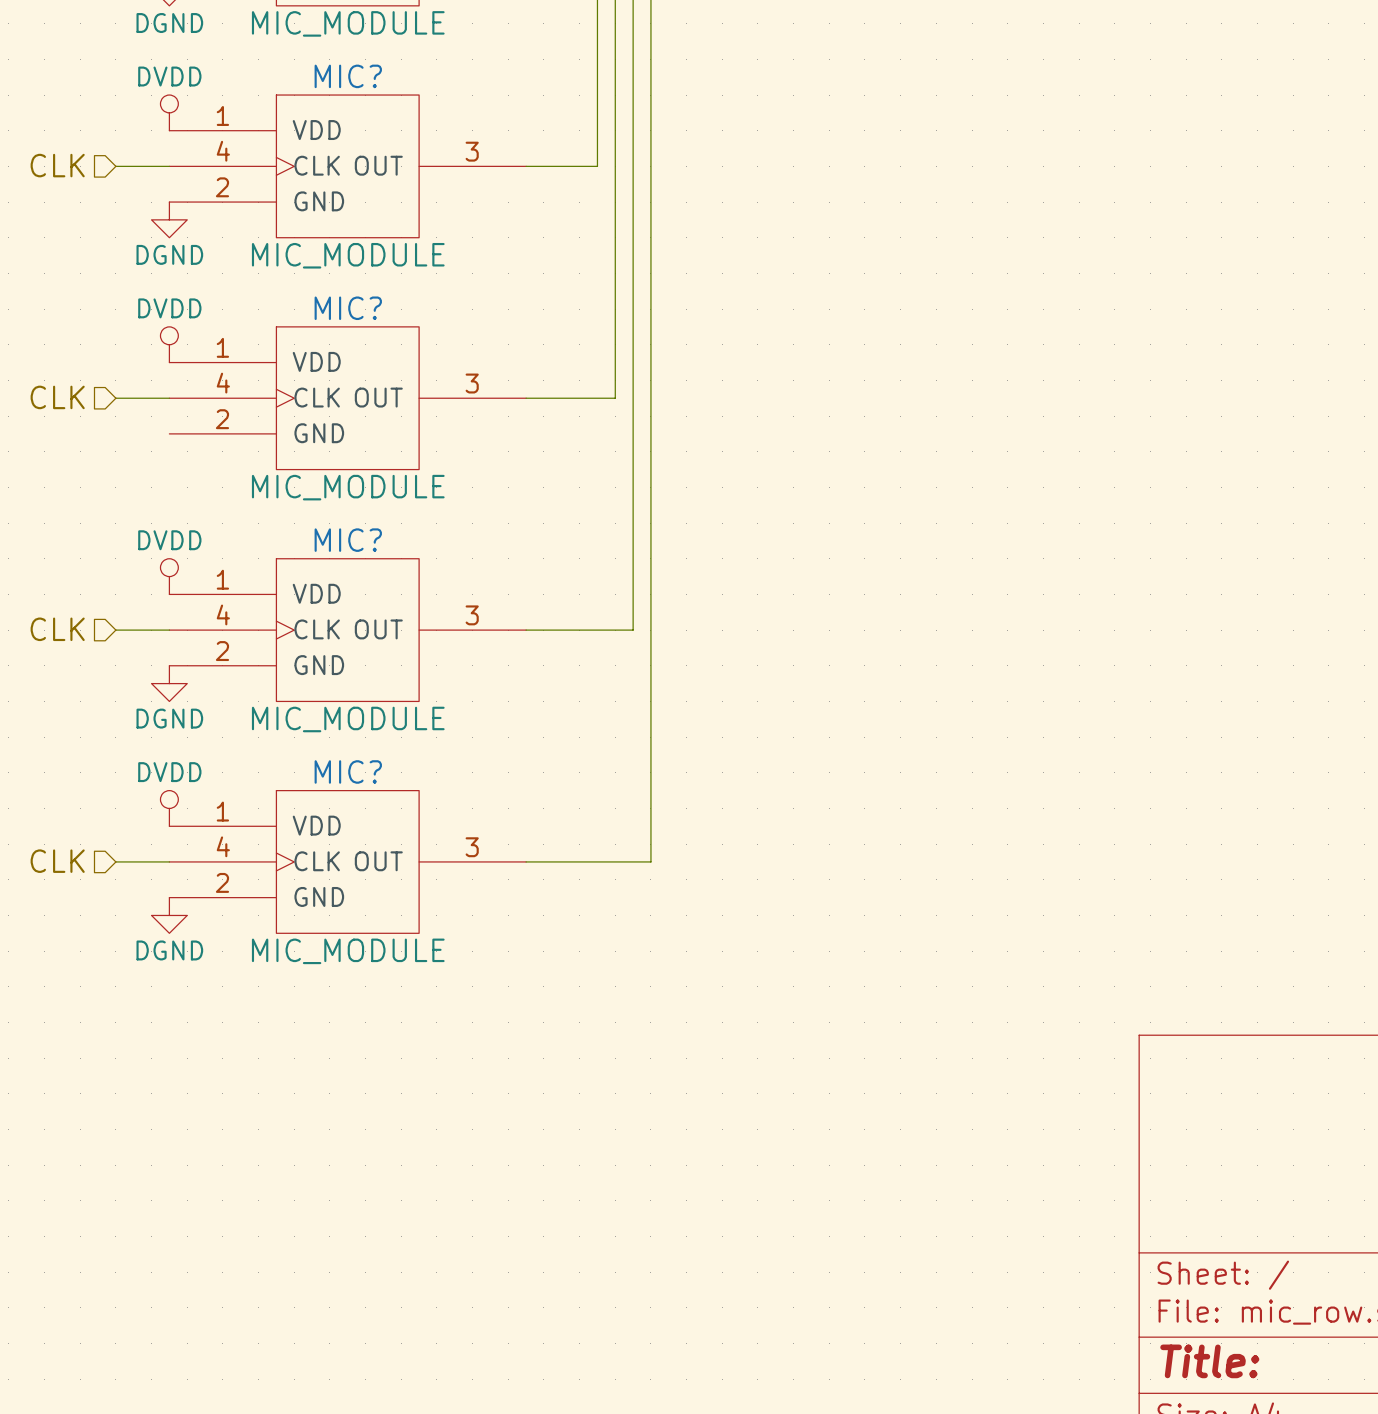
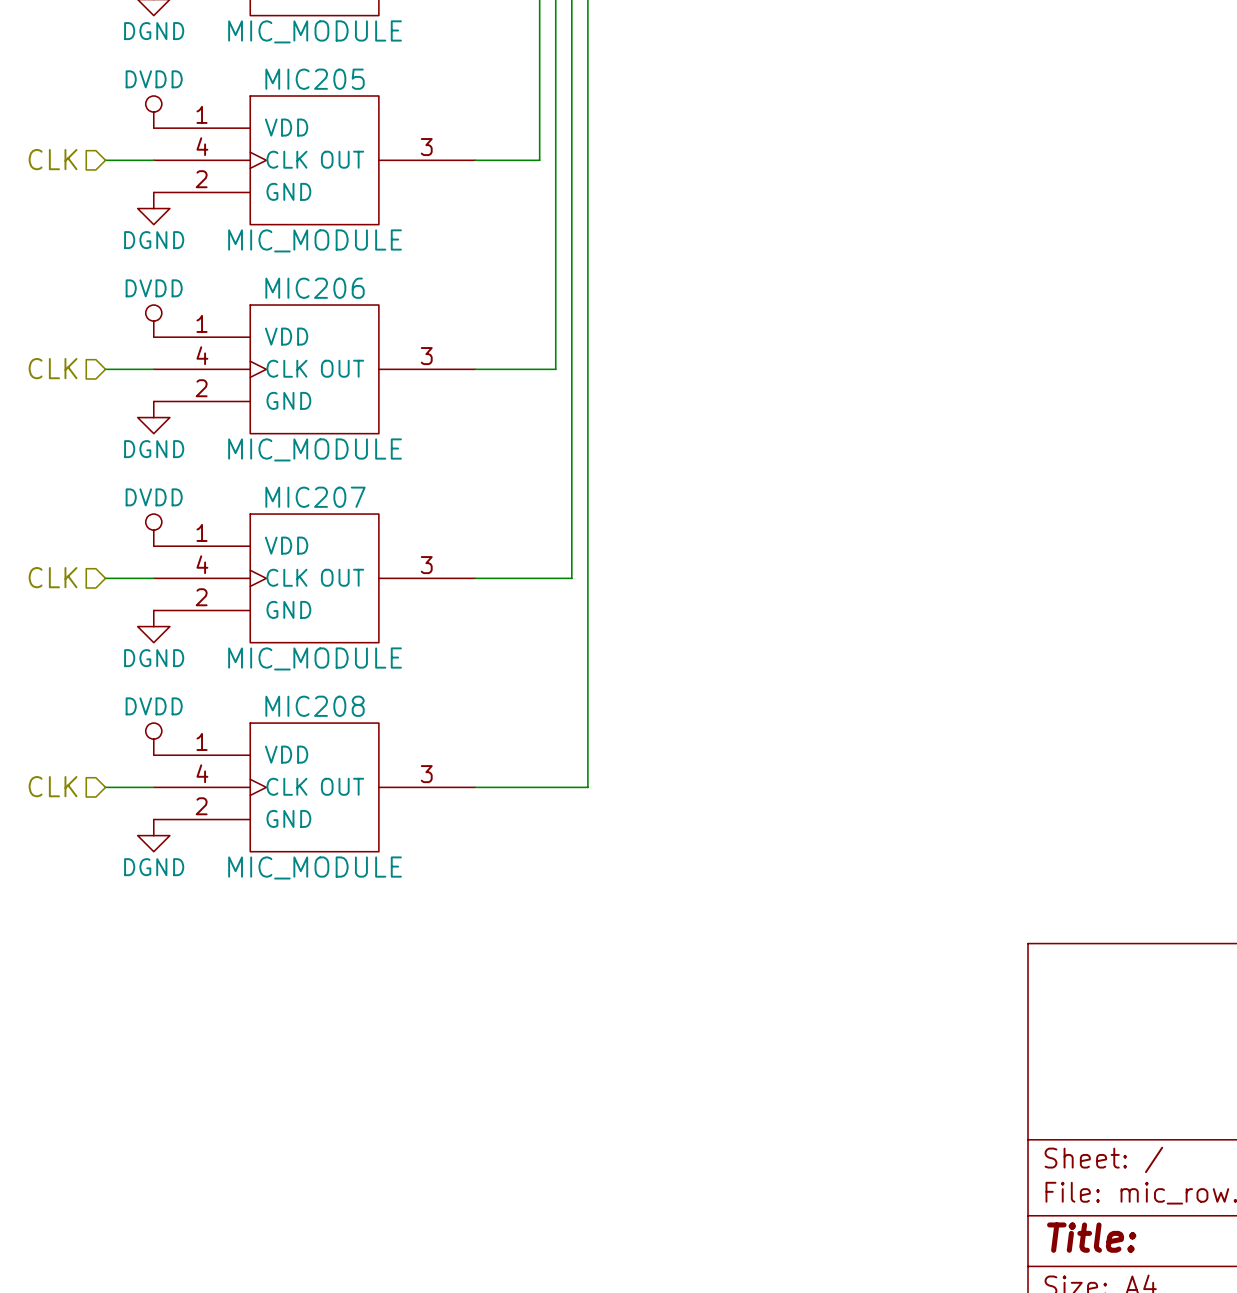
MIC? name: MIC? (348, 76) -> MIC205 (315, 79)
MIC? name: MIC? (348, 308) -> MIC206 (315, 288)
power symbol: none -> DGND (153, 417)
MIC? name: MIC? (348, 540) -> MIC207 (315, 497)
MIC? name: MIC? (348, 771) -> MIC208 (315, 706)

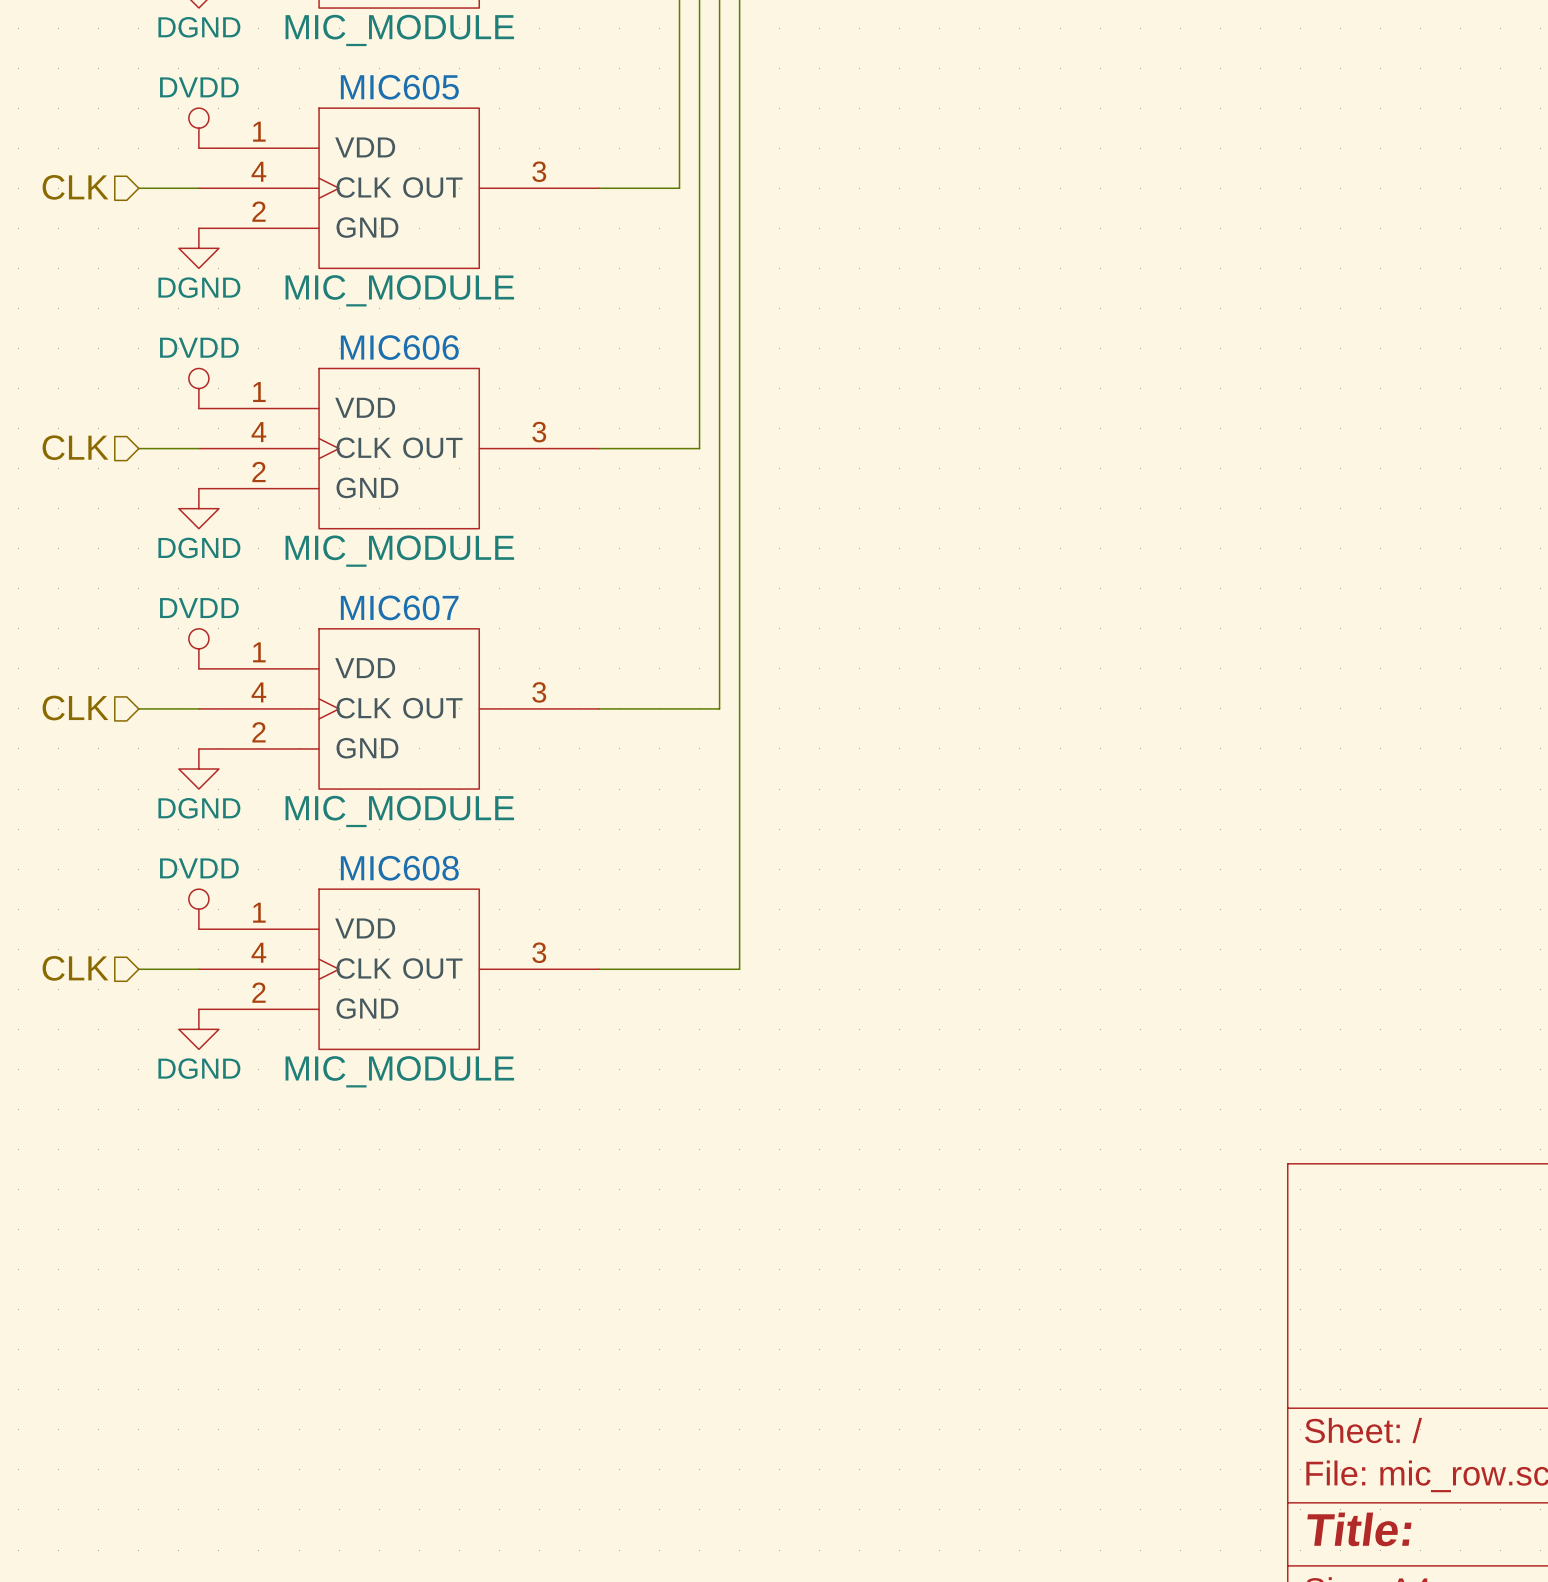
MIC205 name: MIC205 (315, 79) -> MIC605 (399, 87)
MIC206 name: MIC206 (315, 288) -> MIC606 (399, 347)
MIC207 name: MIC207 (315, 497) -> MIC607 (399, 607)
MIC208 name: MIC208 (315, 706) -> MIC608 (399, 868)

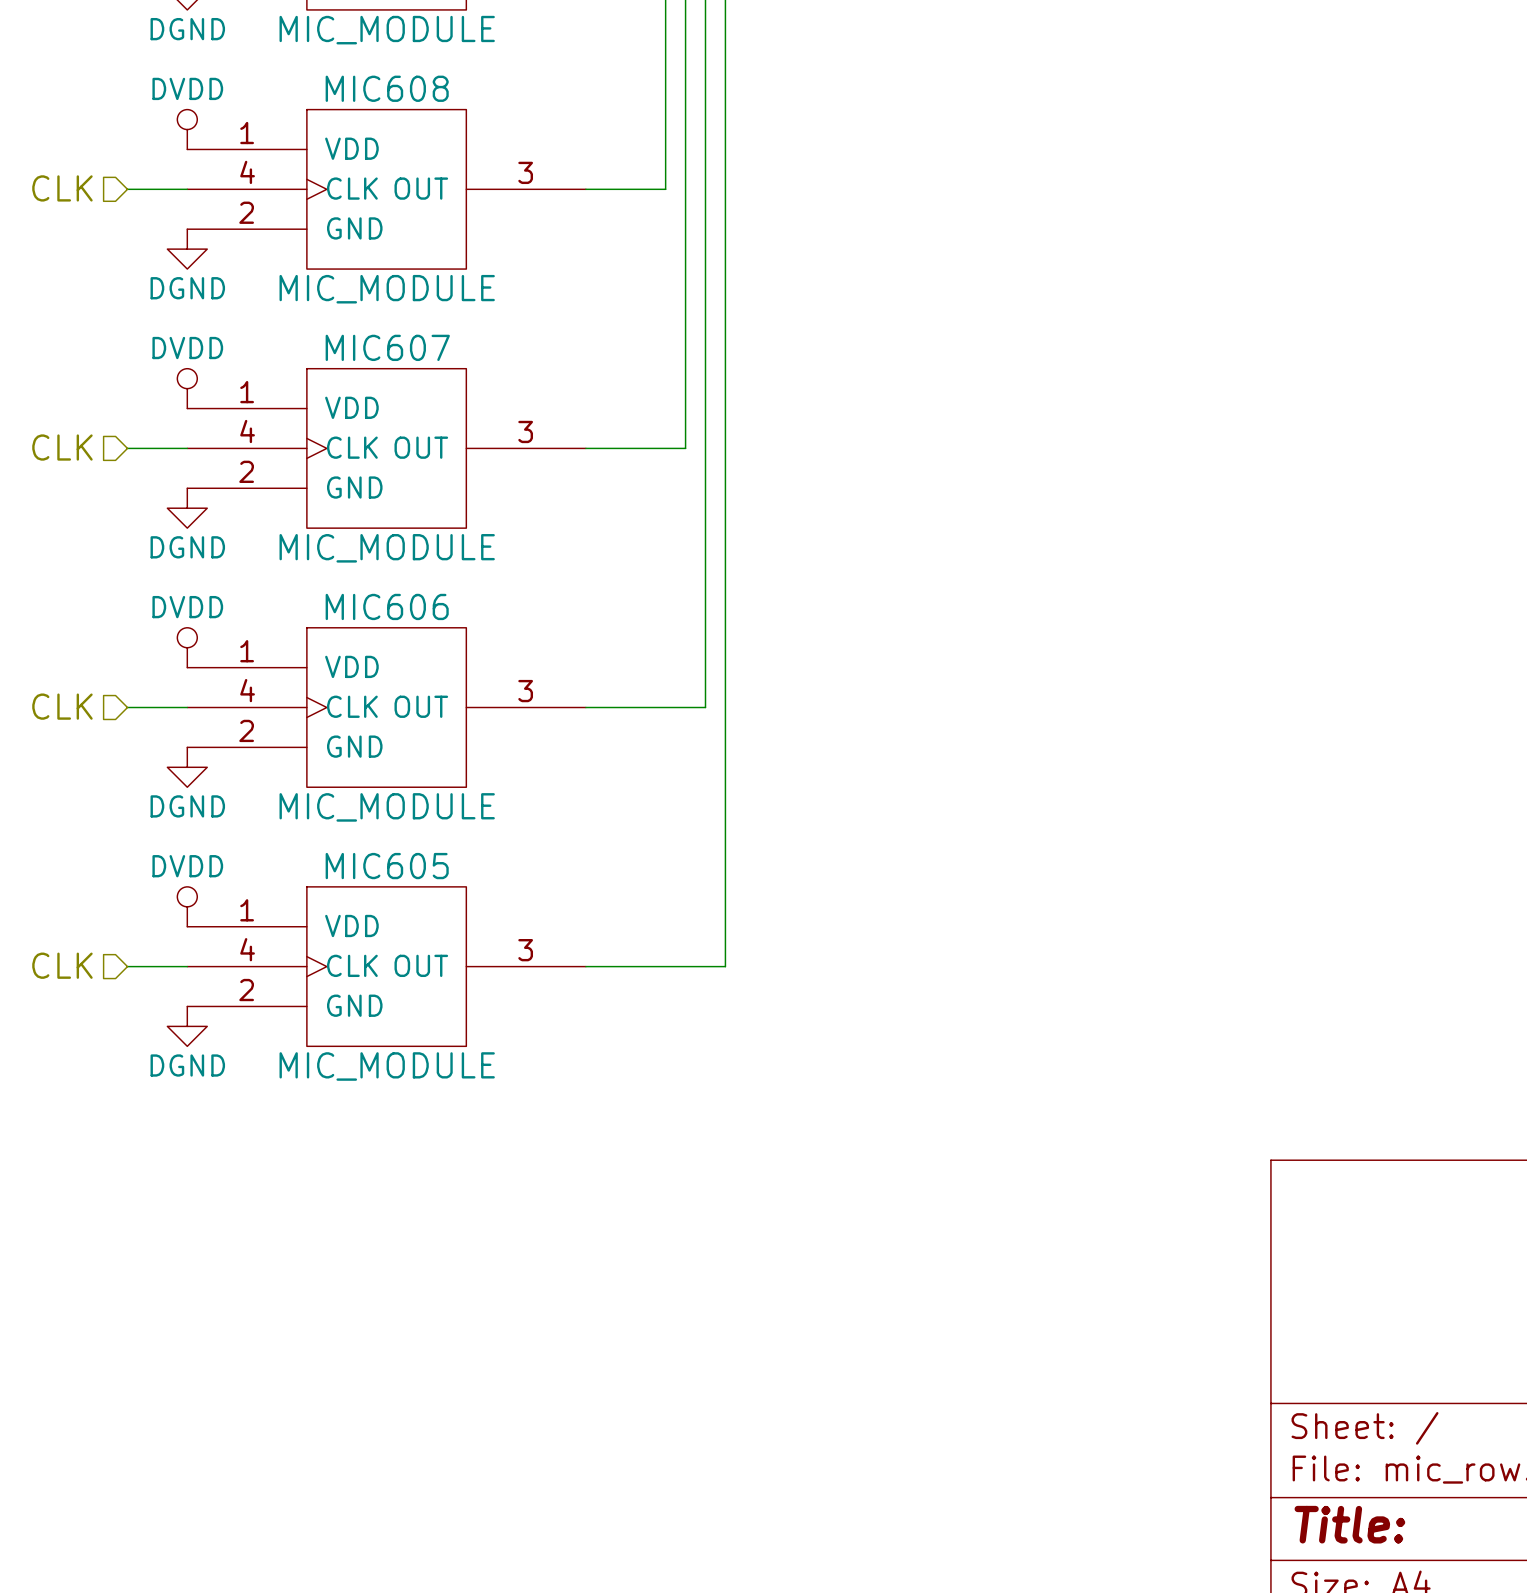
MIC605 name: MIC605 (399, 87) -> MIC608 (387, 88)
MIC606 name: MIC606 (399, 347) -> MIC607 (387, 347)
MIC607 name: MIC607 (399, 607) -> MIC606 (387, 606)
MIC608 name: MIC608 (399, 868) -> MIC605 (387, 866)

